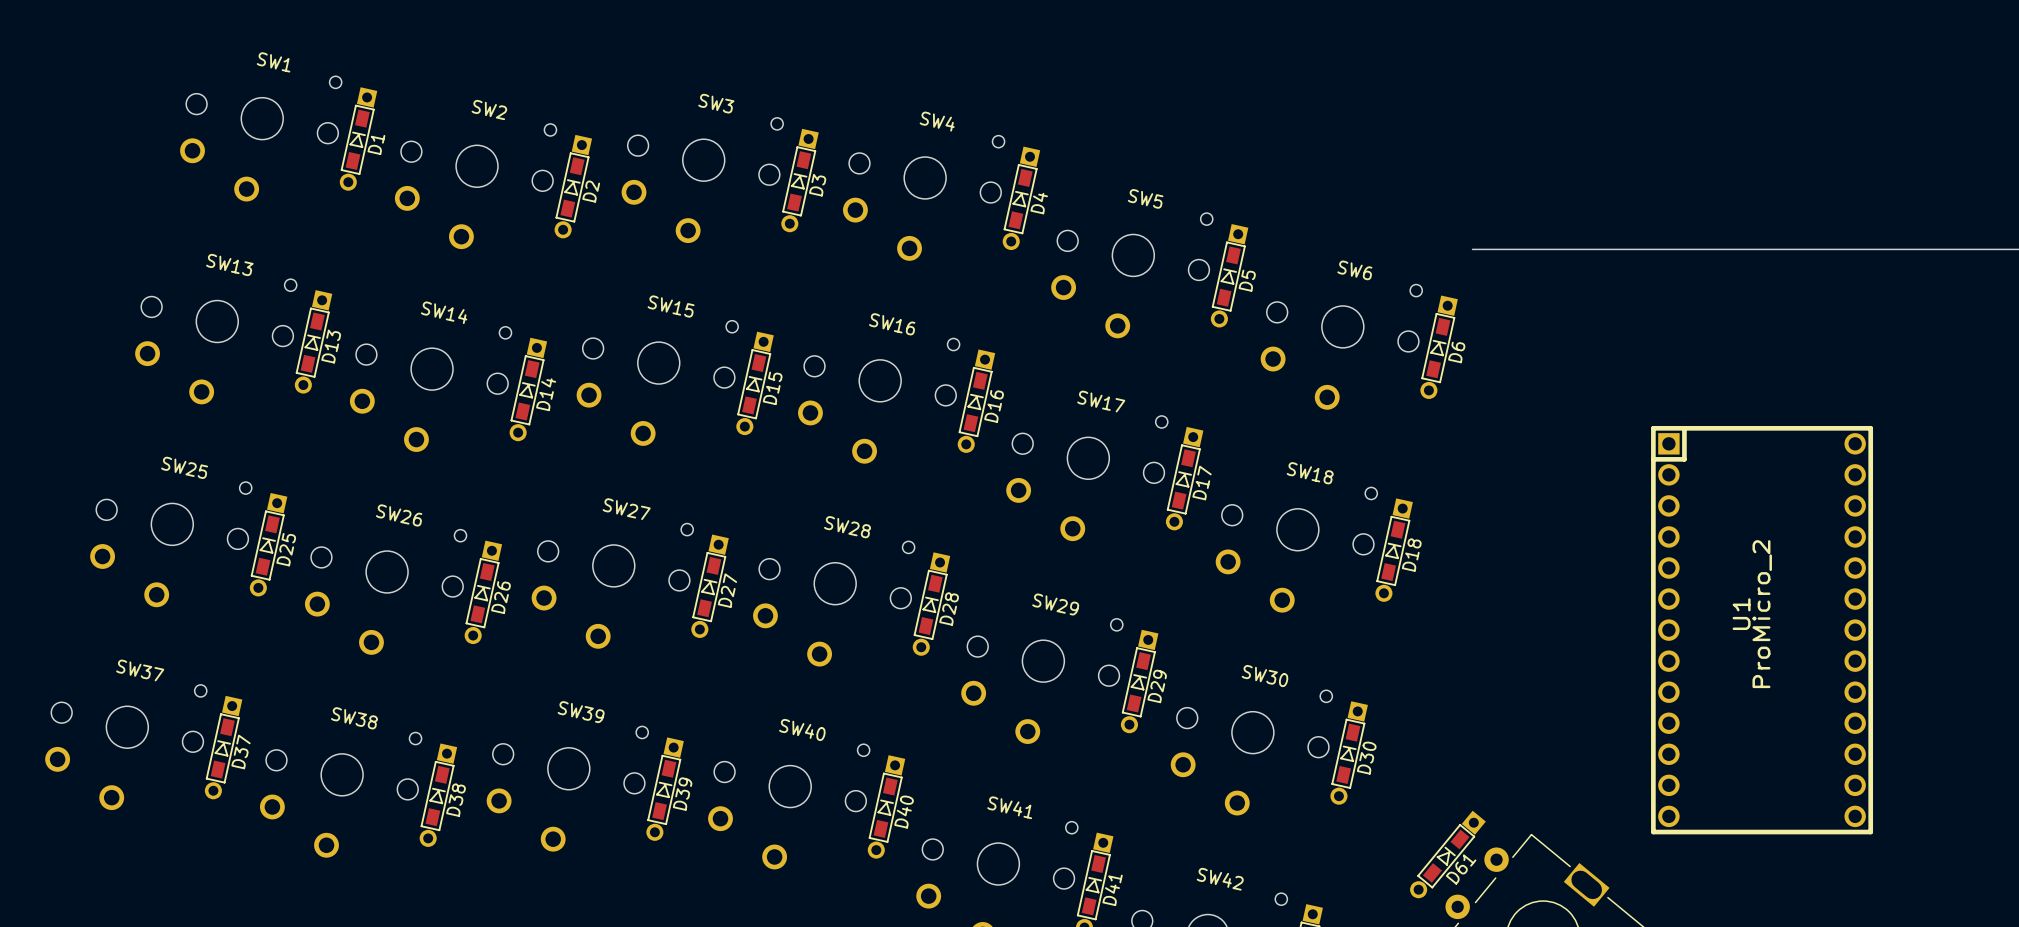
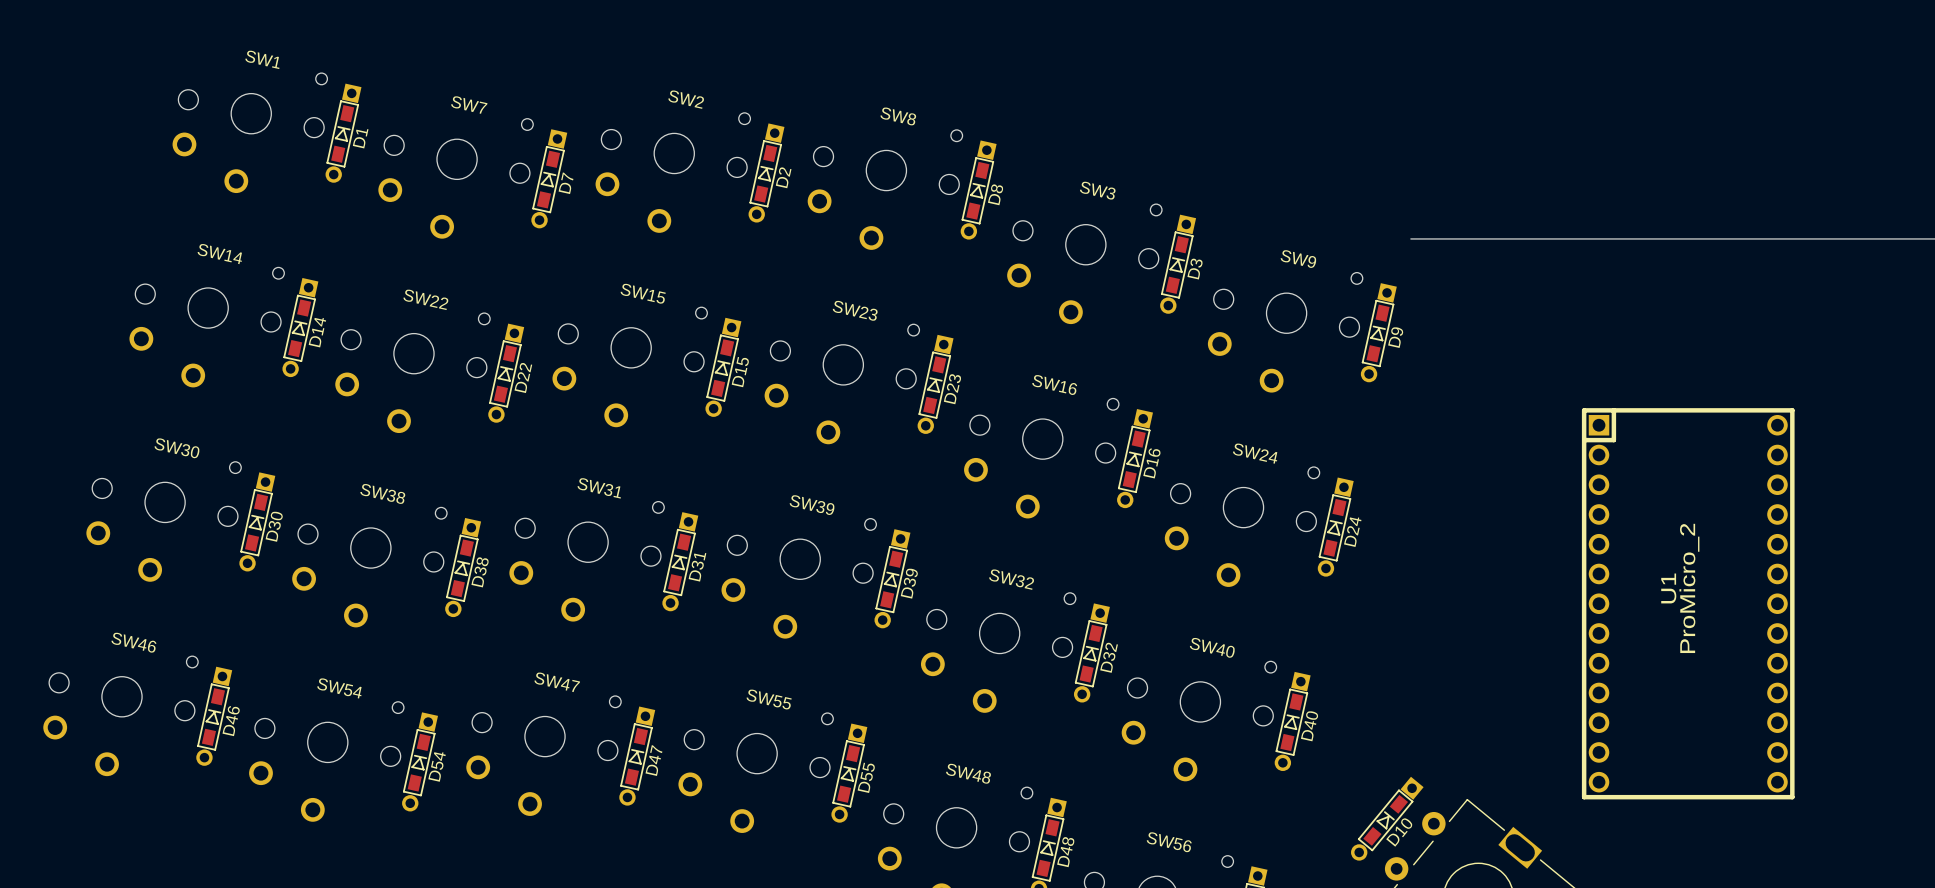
SW3 name: SW3 (716, 103) -> SW2 (686, 99)
SW2 name: SW2 (489, 109) -> SW7 (469, 104)
SW4 name: SW4 (937, 121) -> SW8 (898, 116)
D3 name: D3 (817, 185) -> D2 (783, 177)
D2 name: D2 (591, 191) -> D7 (566, 183)
SW5 name: SW5 (1145, 198) -> SW3 (1097, 190)
D4 name: D4 (1039, 203) -> D8 (995, 194)
SW13 name: SW13 (229, 264) -> SW14 (219, 253)
SW6 name: SW6 (1354, 270) -> SW9 (1298, 259)
D5 name: D5 (1247, 280) -> D3 (1195, 268)
SW14 name: SW14 (444, 312) -> SW22 (425, 299)
SW16 name: SW16 (892, 324) -> SW23 (855, 310)
D13 name: D13 (331, 346) -> D14 (317, 332)
D6 name: D6 (1456, 352) -> D9 (1395, 337)
D14 name: D14 (546, 394) -> D22 (523, 377)
SW17 name: SW17 (1101, 401) -> SW16 (1054, 385)
D16 name: D16 (994, 406) -> D23 (952, 389)
SW25 name: SW25 (184, 467) -> SW30 (177, 448)
SW18 name: SW18 (1310, 473) -> SW24 (1255, 453)
D17 name: D17 (1202, 483) -> D16 (1152, 463)
SW27 name: SW27 (626, 509) -> SW31 (599, 488)
SW26 name: SW26 (399, 515) -> SW38 (382, 493)
SW28 name: SW28 (847, 527) -> SW39 (812, 505)
D25 name: D25 (286, 549) -> D30 (274, 526)
D18 name: D18 (1411, 555) -> D24 (1352, 532)
D27 name: D27 (727, 590) -> D31 (697, 567)
D26 name: D26 (501, 597) -> D38 (480, 572)
SW29 name: SW29 (1055, 604) -> SW32 (1011, 579)
D28 name: D28 (949, 608) -> D39 (909, 583)
SW37 name: SW37 (140, 670) -> SW46 (133, 642)
SW30 name: SW30 (1264, 676) -> SW40 (1212, 647)
D29 name: D29 (1157, 686) -> D32 (1109, 657)
SW39 name: SW39 (581, 712) -> SW47 (557, 682)
SW38 name: SW38 (354, 718) -> SW54 (339, 688)
SW40 name: SW40 (802, 729) -> SW55 (769, 699)
D37 name: D37 (240, 751) -> D46 (231, 721)
D30 name: D30 (1366, 758) -> D40 (1309, 726)
D39 name: D39 (682, 794) -> D47 (653, 760)
D38 name: D38 (456, 800) -> D54 (437, 767)
SW41 name: SW41 (1009, 807) -> SW48 (968, 773)
D40 name: D40 (904, 812) -> D55 (866, 777)
D61 name: D61 (1461, 869) -> D10 (1399, 832)
SW42 name: SW42 (1220, 879) -> SW56 (1169, 842)
D41 name: D41 (1112, 890) -> D48 (1065, 852)

